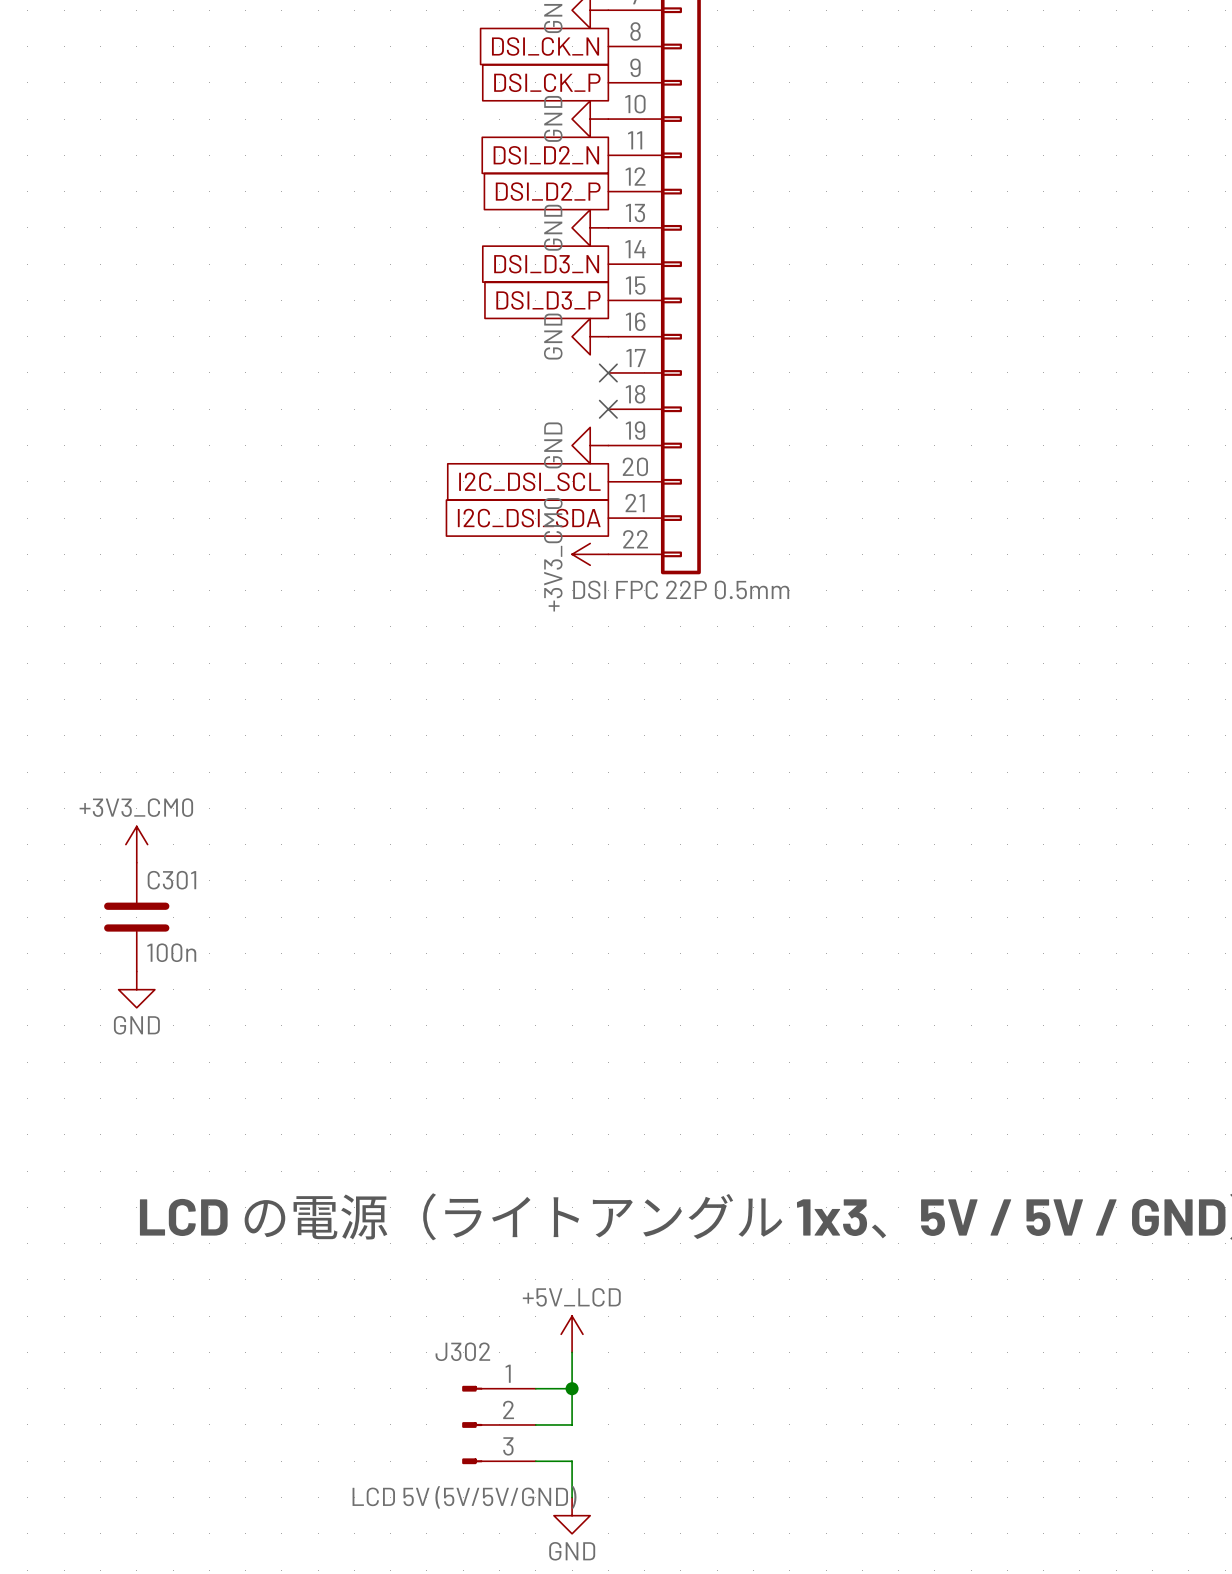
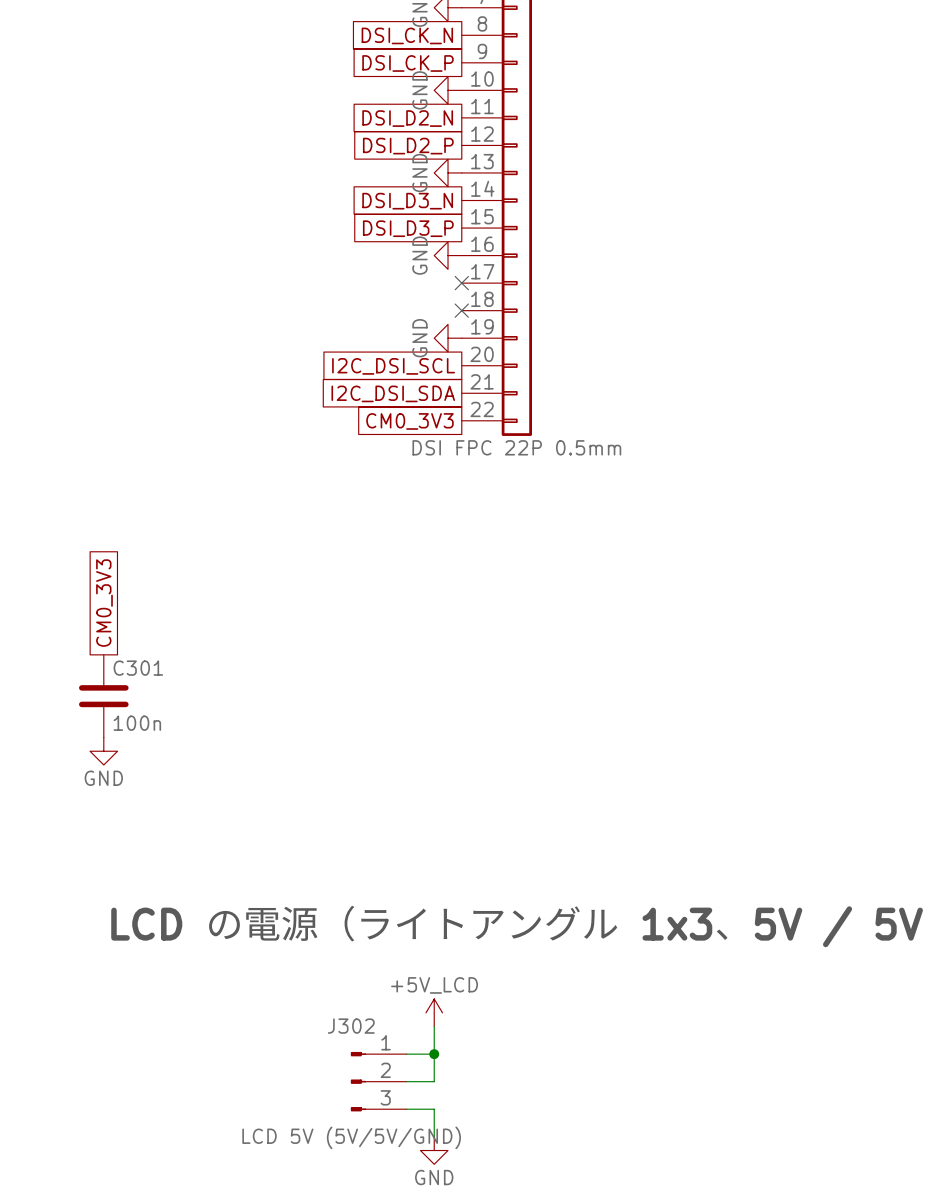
global label: none -> CM0_3V3 (409, 421)
power symbol: +3V3_CM0 (590, 554) -> none
global label: none -> CM0_3V3 (104, 603)
power symbol: +3V3_CM0 (136, 844) -> none

